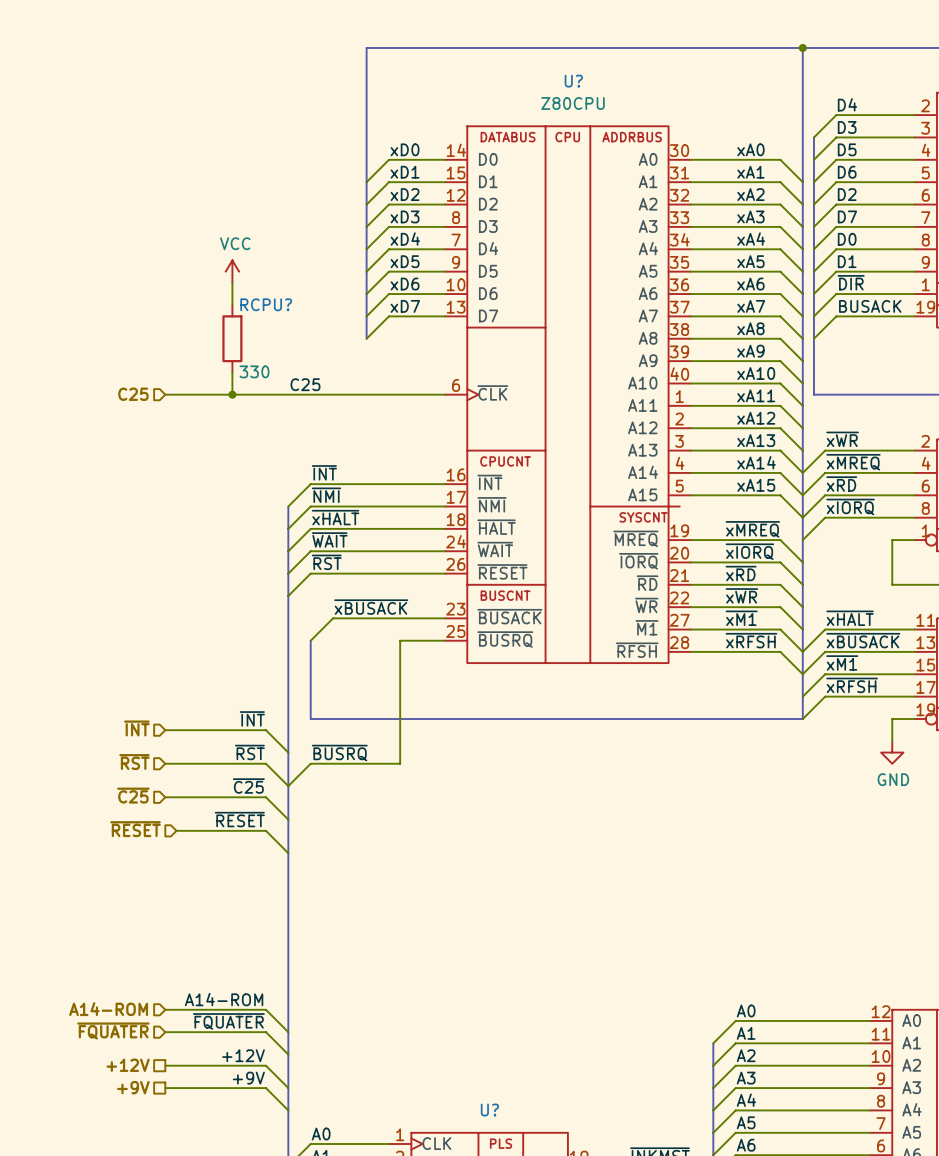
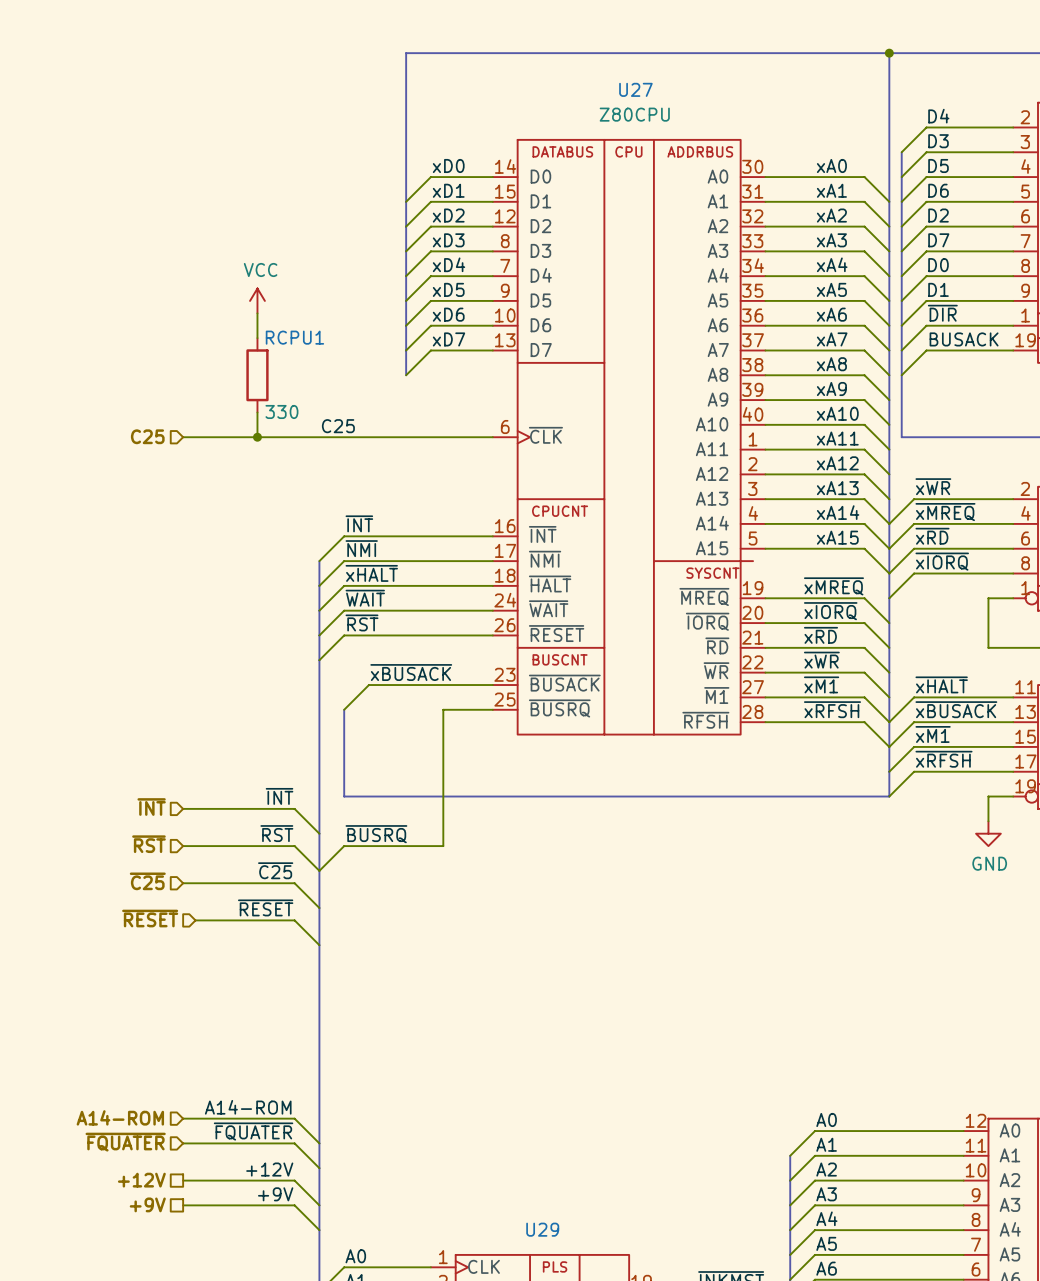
U? name: U? (573, 81) -> U27 (635, 89)
RCPU? name: RCPU? (266, 304) -> RCPU1 (294, 337)
U? name: U? (489, 1110) -> U29 (542, 1229)

